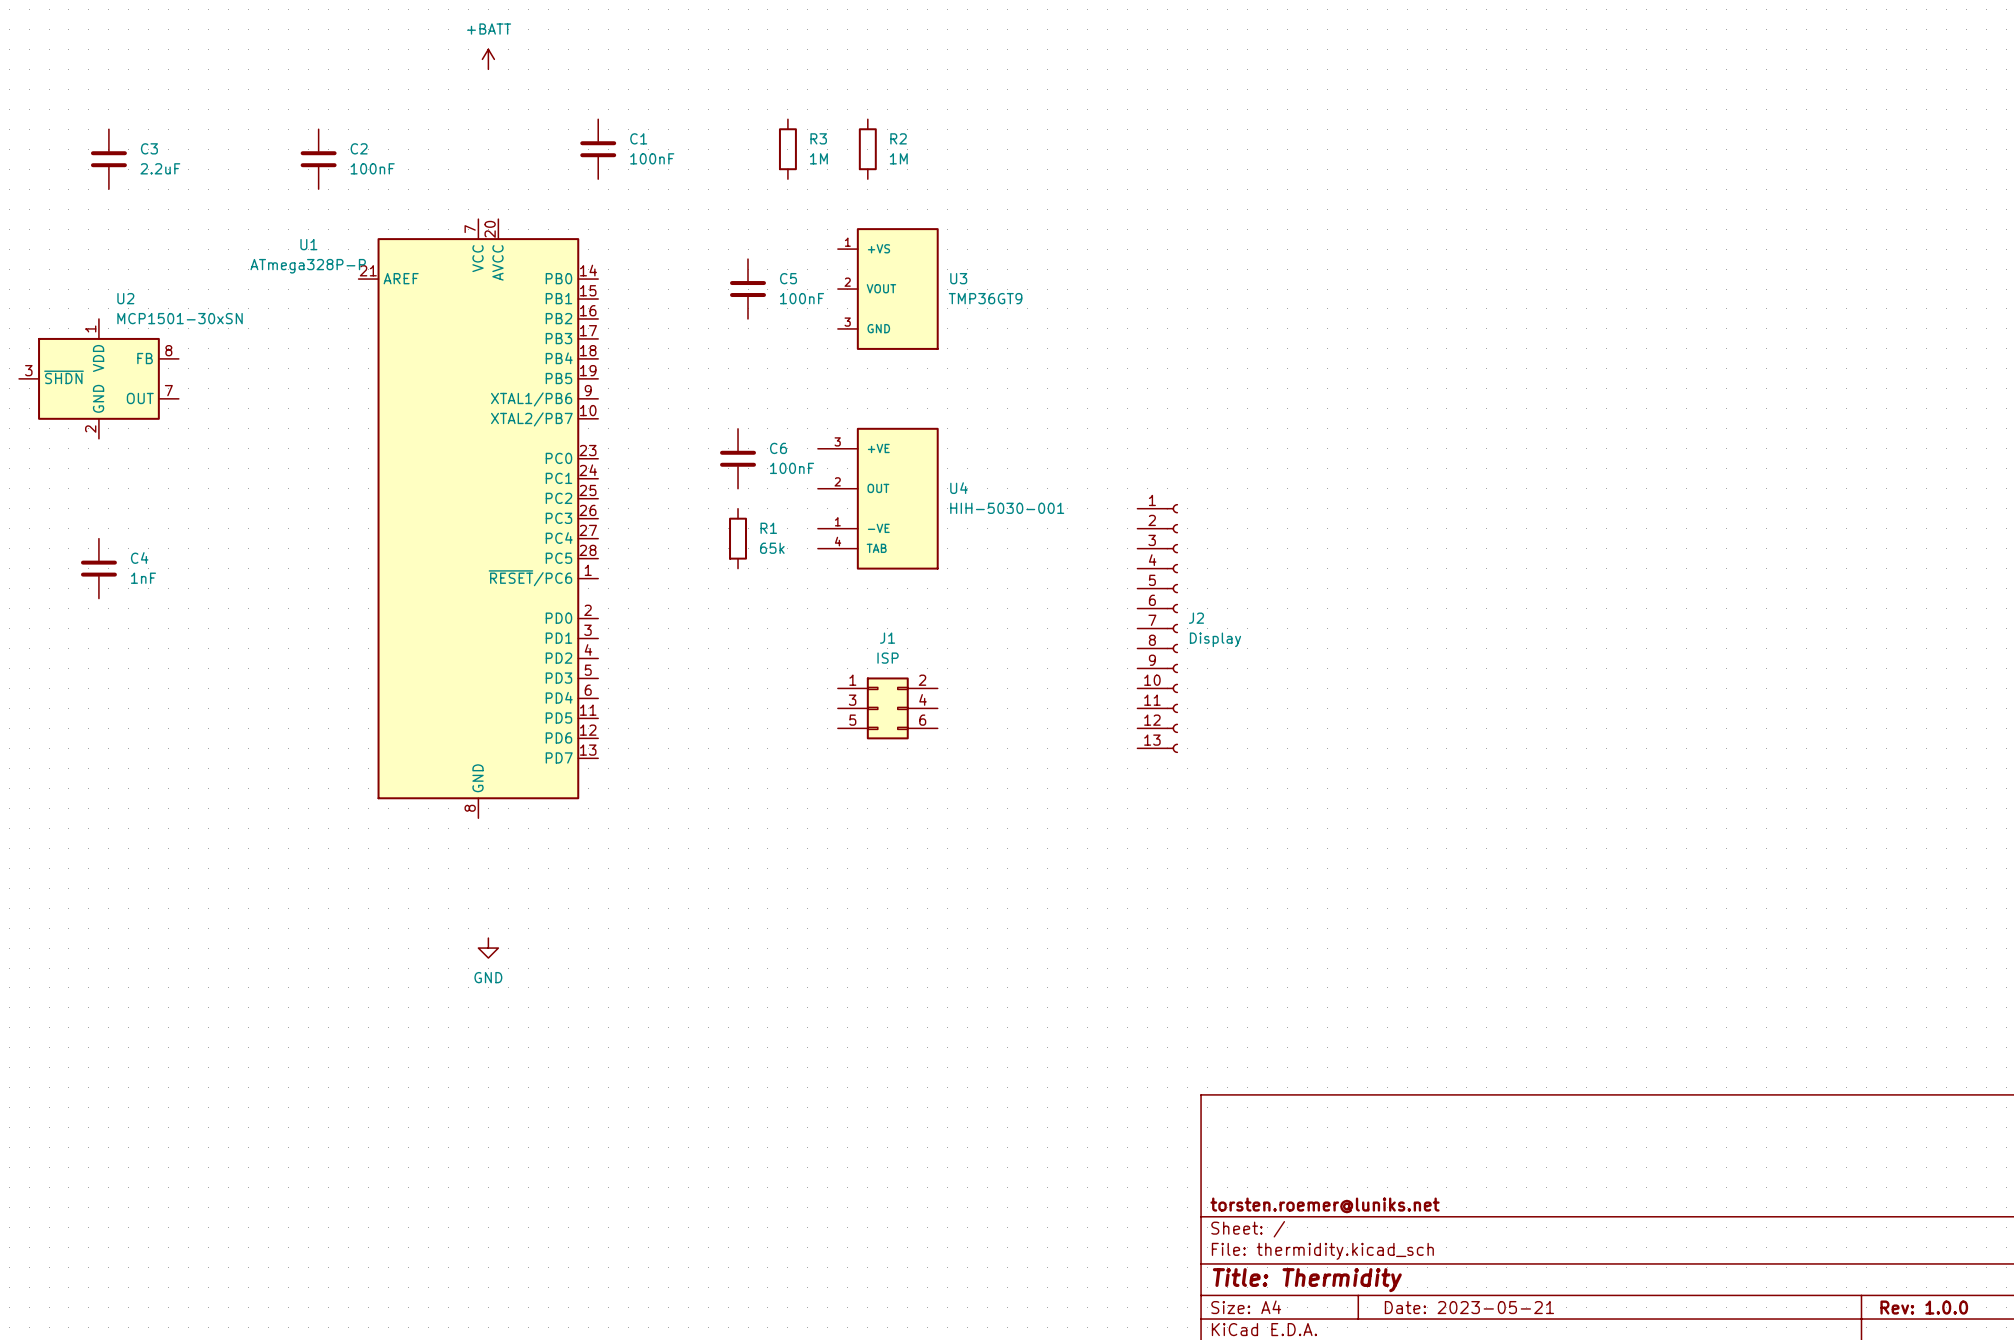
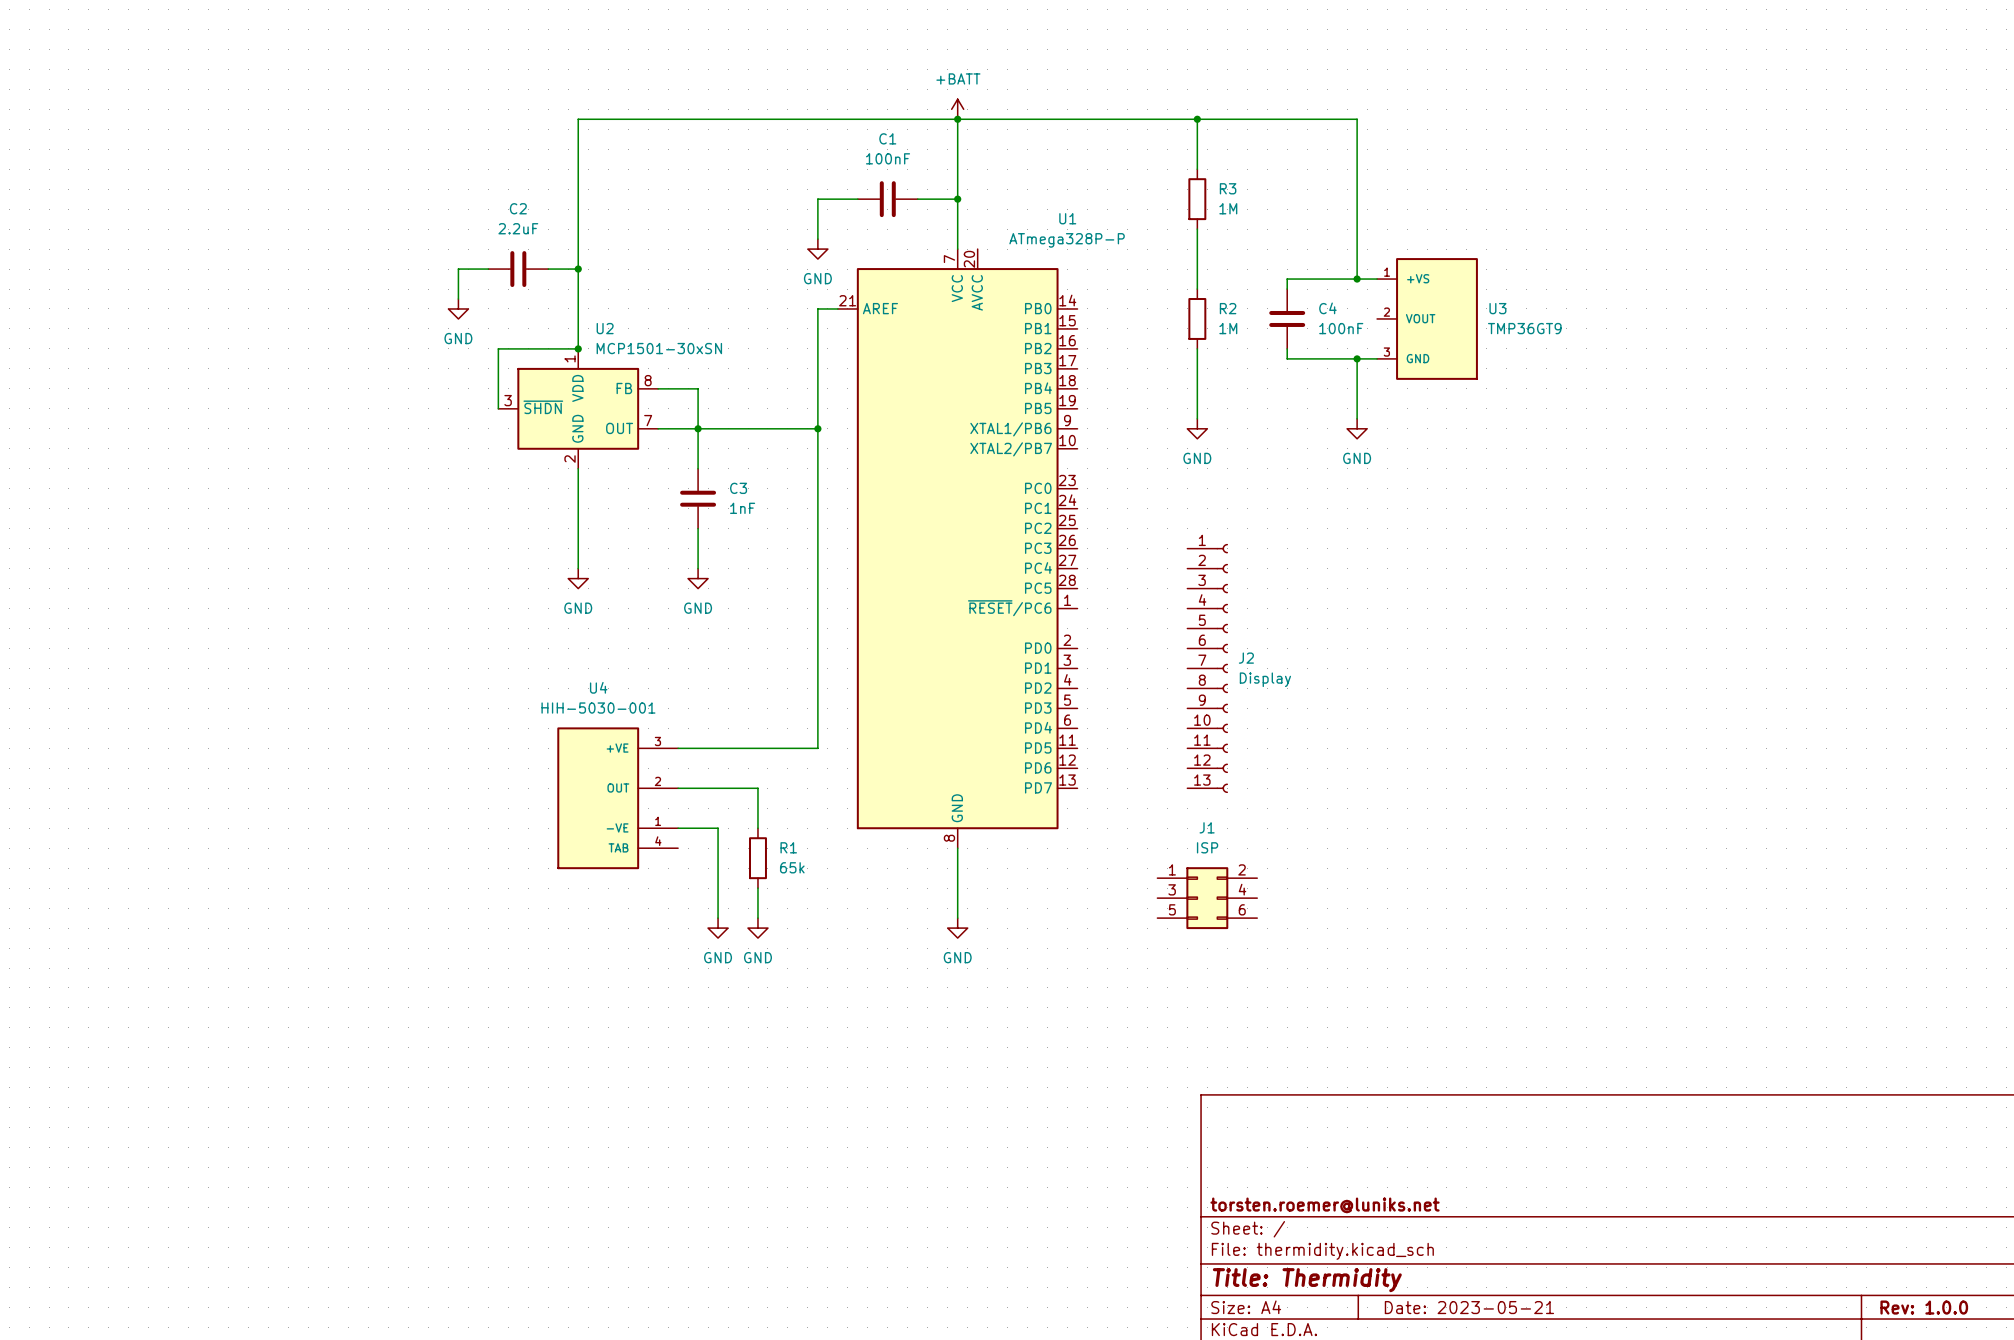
power symbol: +BATT (488, 59) -> none
power symbol: none -> +BATT (957, 109)
wire: none -> (957, 119) (957, 249)
junction: none -> (957, 119)
wire: none -> (1197, 119) (1197, 169)
junction: none -> (1197, 119)
C1 name position: C1 (638, 138) -> C1 (887, 138)
C2 name position: C2 (359, 148) -> C2 (518, 208)
C1 rotation: 0° (598, 149) -> 90° clockwise (887, 199)
C1 position: (598, 149) -> (887, 199)
R3 position: (787, 149) -> (1197, 199)
R2 position: (867, 149) -> (1197, 318)
C1 value position: 100nF (652, 158) -> 100nF (888, 158)
C3 position: (108, 159) -> (698, 498)
C2 rotation: 0° (318, 159) -> 90° clockwise (518, 269)
C2 position: (318, 159) -> (518, 269)
C3 value: 2.2uF (160, 168) -> 1nF (742, 508)
C2 value: 100nF (372, 168) -> 2.2uF (518, 228)
wire: none -> (857, 199) (817, 199) (817, 239)
wire: none -> (917, 199) (957, 199)
junction: none -> (957, 199)
wire: none -> (1197, 229) (1197, 289)
U1 name position: U1 (308, 244) -> U1 (1067, 218)
power symbol: none -> GND (817, 249)
U1 value position: ATmega328P-P (308, 266) -> ATmega328P-P (1067, 240)
junction: none -> (578, 269)
wire: none -> (1357, 279) (1357, 119) (578, 119) (578, 348) (498, 348) (498, 408)
junction: none -> (1357, 279)
wire: none -> (1377, 279) (1287, 279) (1287, 289)
C5: 100nF (748, 289) -> none
U3 position: (888, 289) -> (1427, 318)
power symbol: none -> GND (458, 308)
wire: none -> (837, 308) (817, 308) (817, 748) (678, 748)
junction: none -> (578, 348)
wire: none -> (1197, 348) (1197, 418)
wire: none -> (1287, 348) (1287, 358) (1377, 358)
wire: none -> (1357, 358) (1357, 418)
junction: none -> (1357, 358)
U2 position: (98, 378) -> (578, 408)
wire: none -> (658, 388) (698, 388) (698, 468)
wire: none -> (658, 428) (817, 428)
junction: none -> (698, 428)
junction: none -> (817, 428)
power symbol: none -> GND (1197, 428)
power symbol: none -> GND (1357, 428)
C6: 100nF (738, 458) -> none
U4 name position: U4 (958, 488) -> U4 (598, 687)
U4 position: (878, 498) -> (617, 798)
U4 flip: as is (897, 498) -> left-right (598, 798)
U4 value position: HIH-5030-001 (1007, 508) -> HIH-5030-001 (598, 708)
U1 position: (478, 518) -> (957, 548)
wire: none -> (698, 528) (698, 568)
R1 position: (738, 538) -> (757, 858)
C4 position: (98, 568) -> (1287, 318)
C4 value: 1nF (143, 578) -> 100nF (1341, 328)
power symbol: none -> GND (578, 578)
power symbol: none -> GND (698, 578)
J2 position: (1157, 628) -> (1207, 668)
J1 position: (887, 708) -> (1207, 898)
wire: none -> (678, 788) (757, 788) (757, 828)
wire: none -> (678, 828) (718, 828) (718, 918)
wire: none -> (957, 848) (957, 918)
wire: none -> (757, 888) (757, 918)
power symbol: none -> GND (718, 928)
power symbol: none -> GND (757, 928)
power symbol: none -> GND (957, 928)
power symbol: GND (488, 948) -> none

